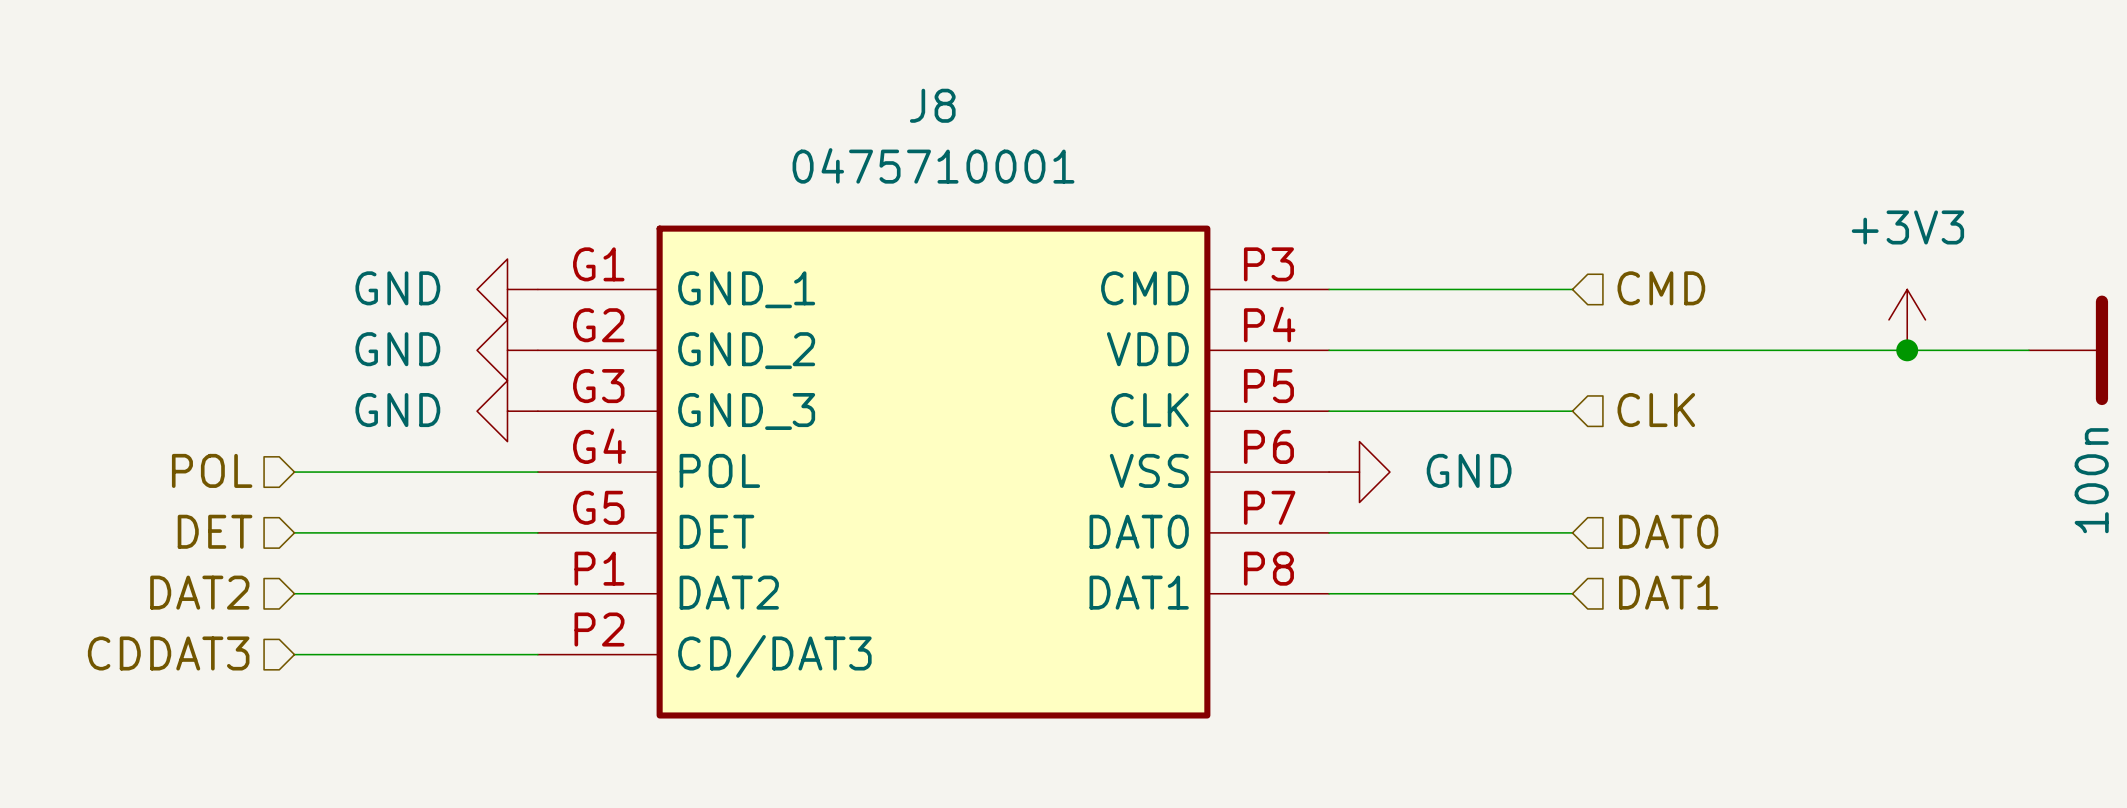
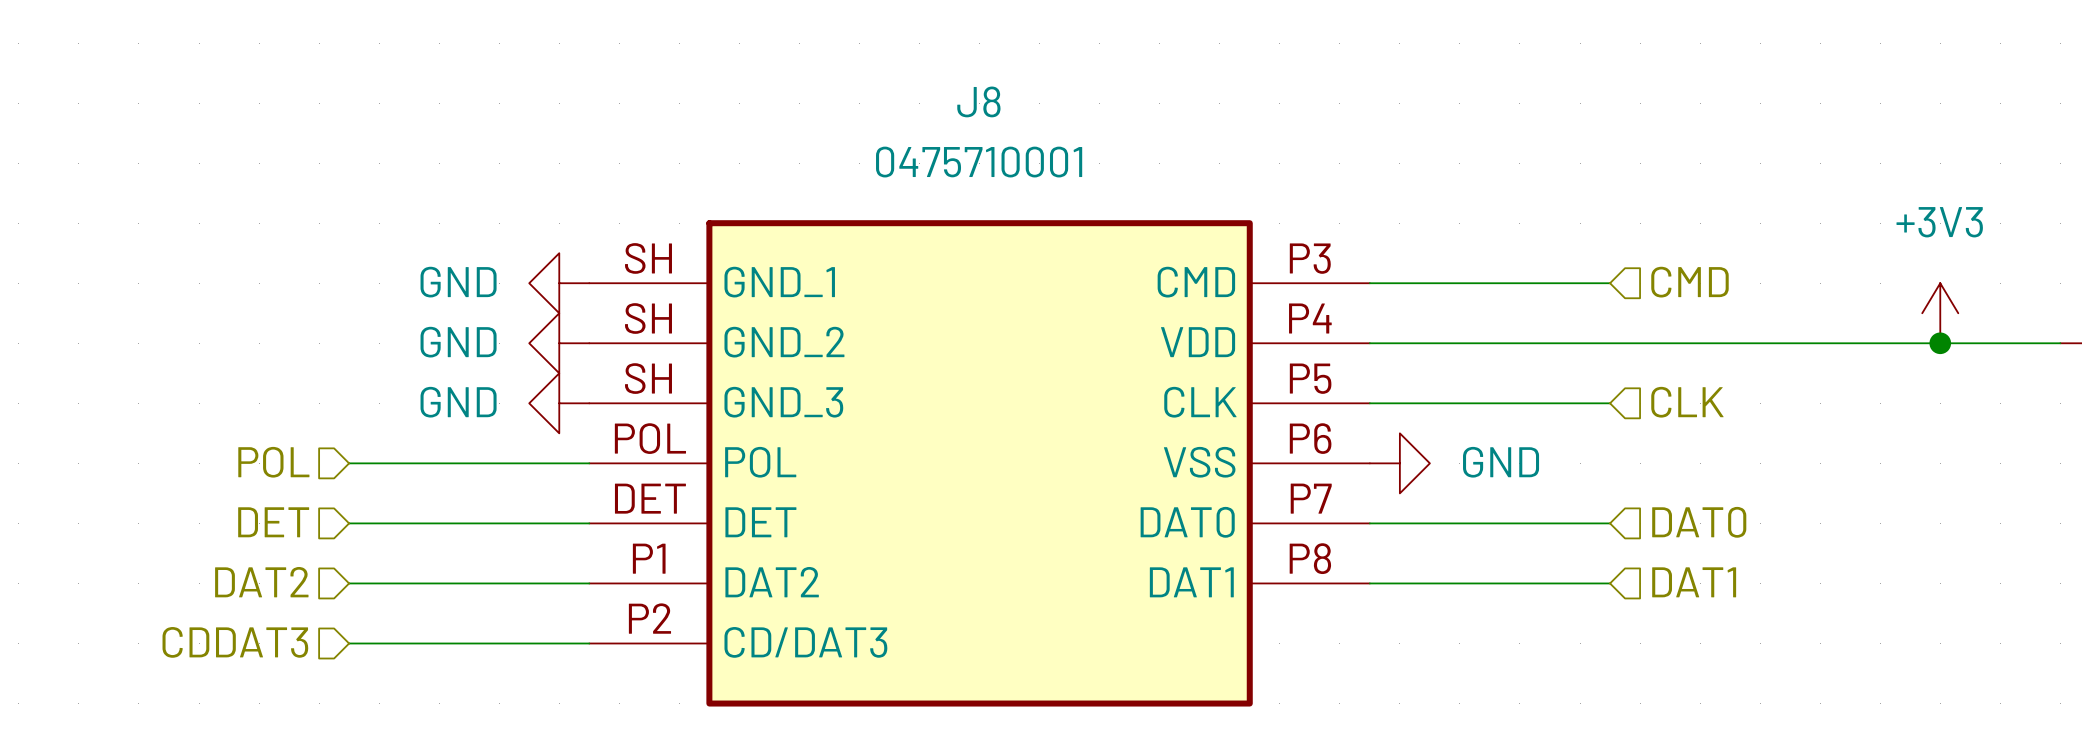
J8 pin number: G1 (598, 264) -> SH (648, 258)
J8 pin number: G2 (598, 325) -> SH (648, 318)
J8 pin number: G3 (598, 386) -> SH (648, 378)
J8 pin number: G4 (599, 446) -> POL (650, 438)
J8 pin number: G5 (598, 507) -> DET (650, 498)

